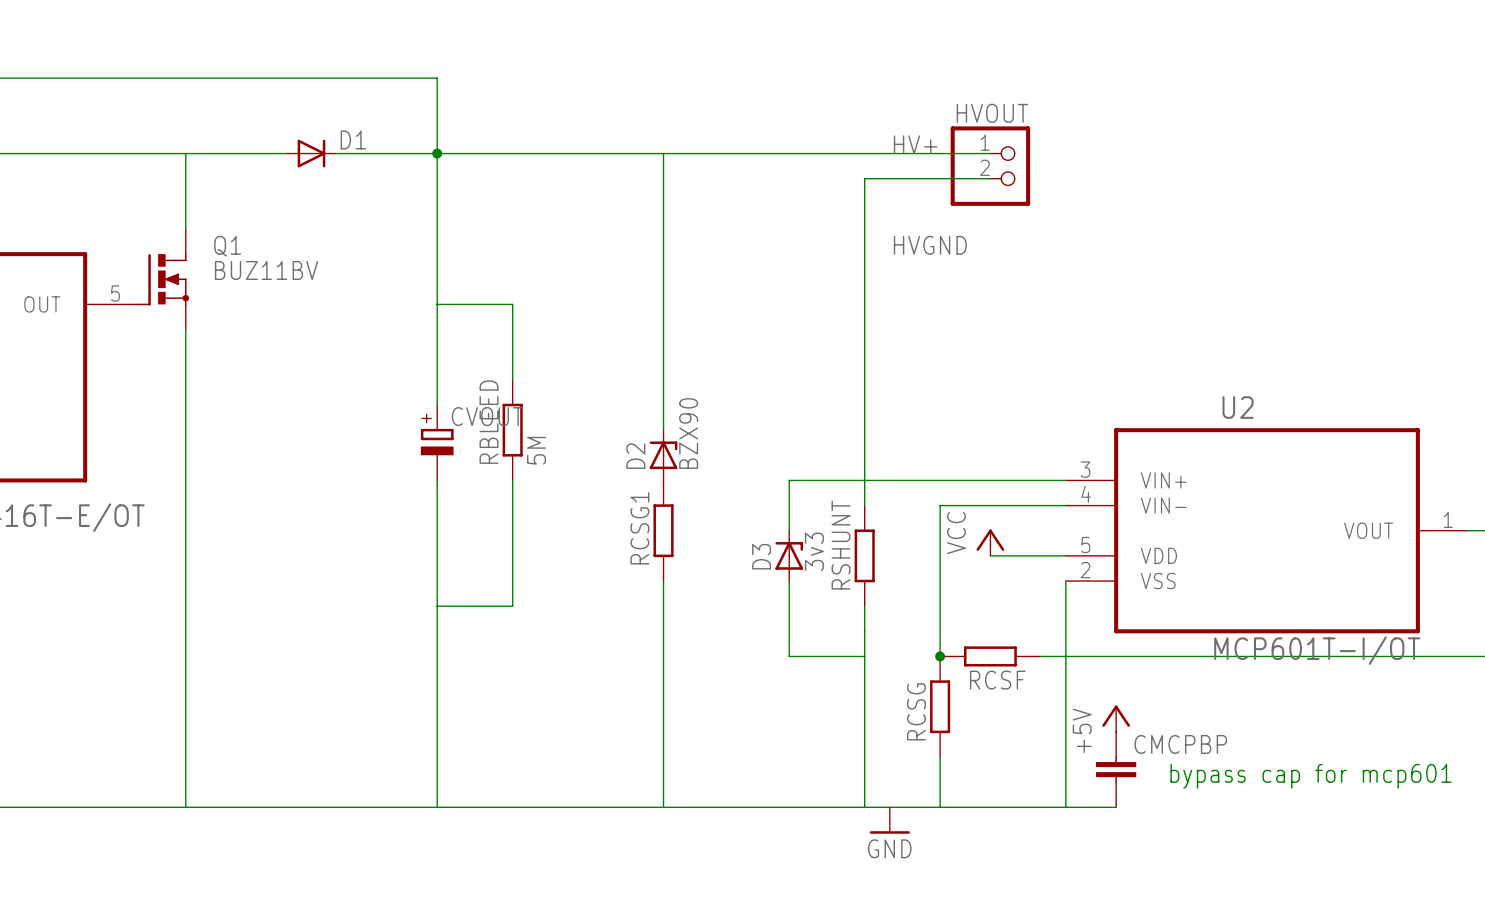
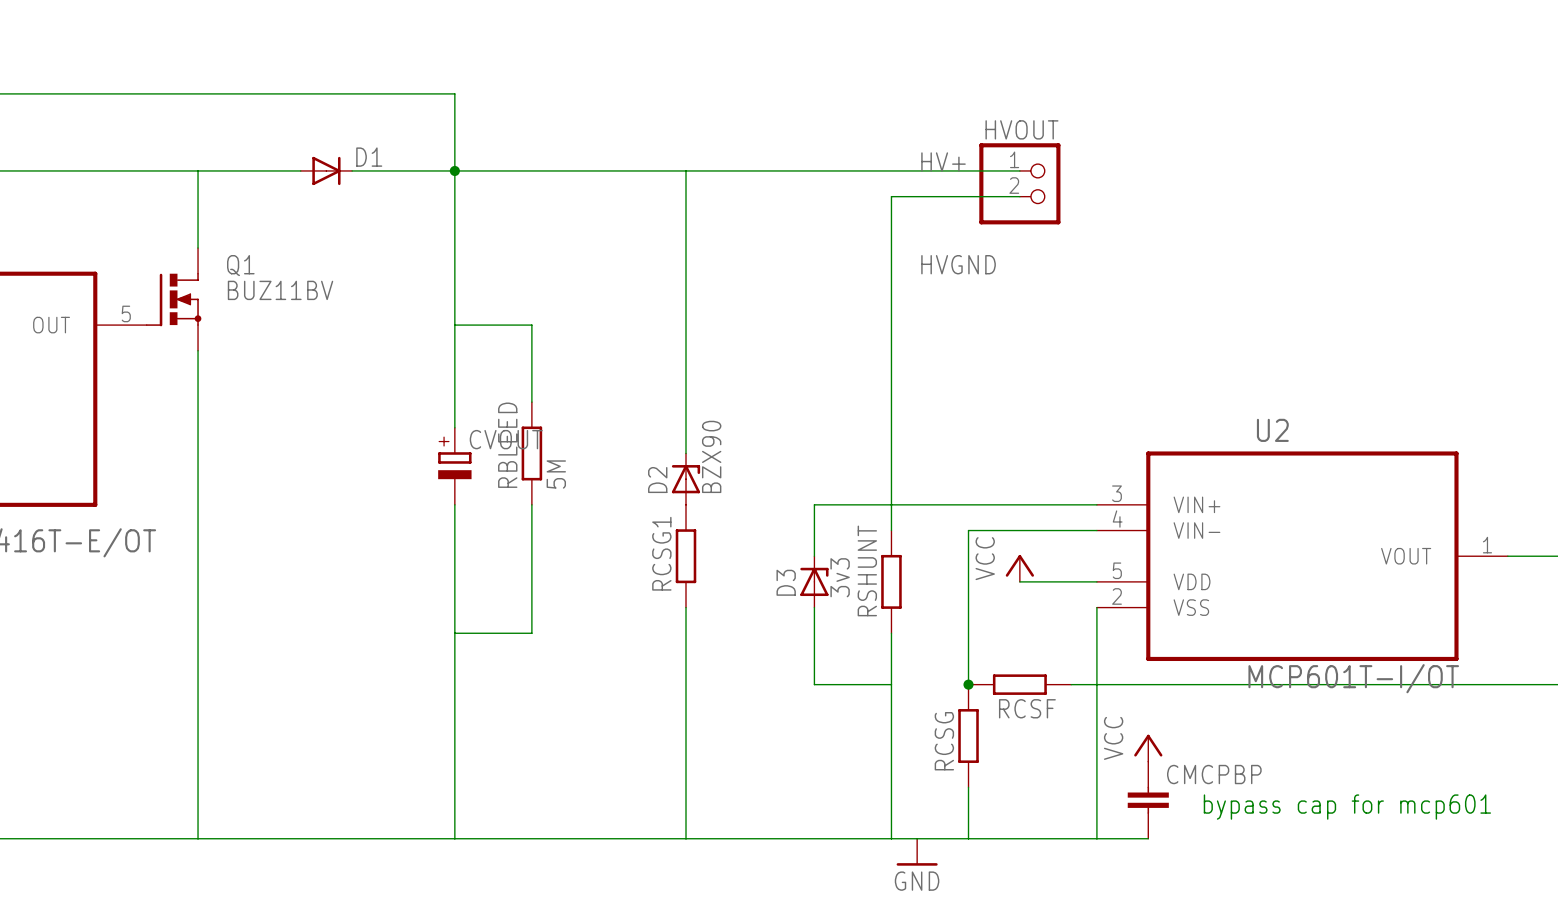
power symbol: +5V (1116, 718) -> VCC (1148, 748)

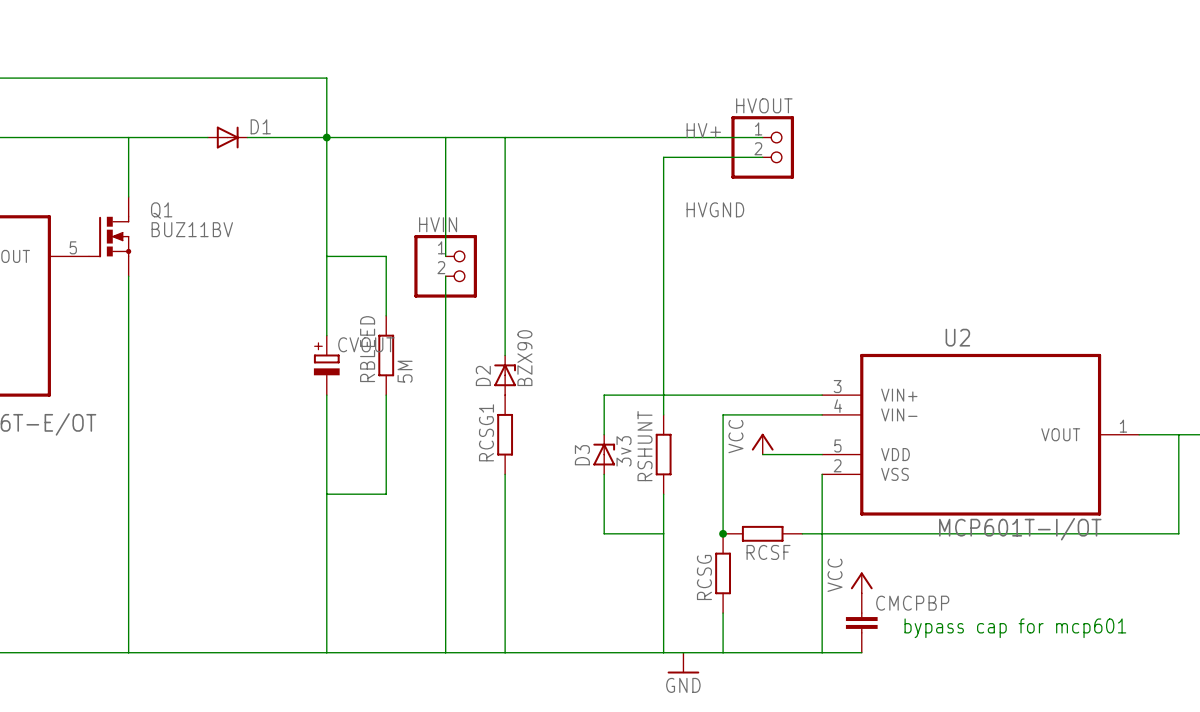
wire: none -> (445, 137) (445, 256)
HVIN: none -> (445, 266)
wire: none -> (445, 276) (445, 652)

